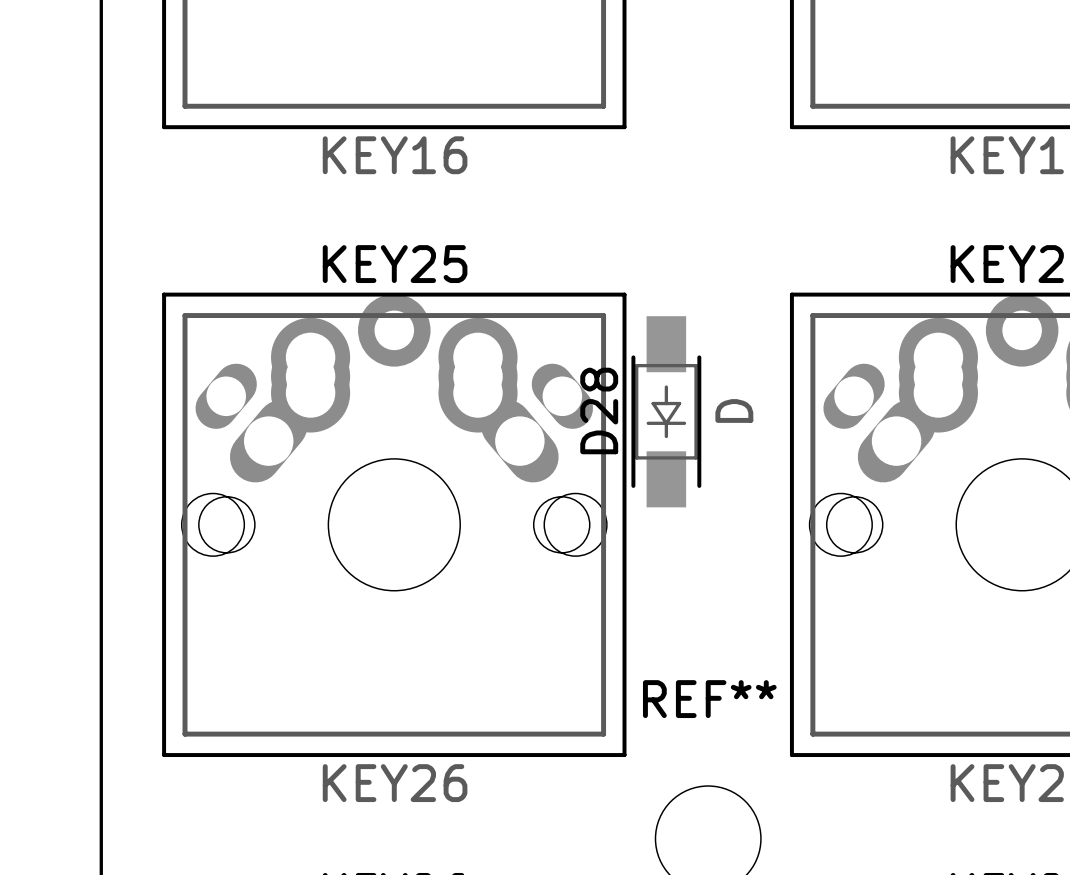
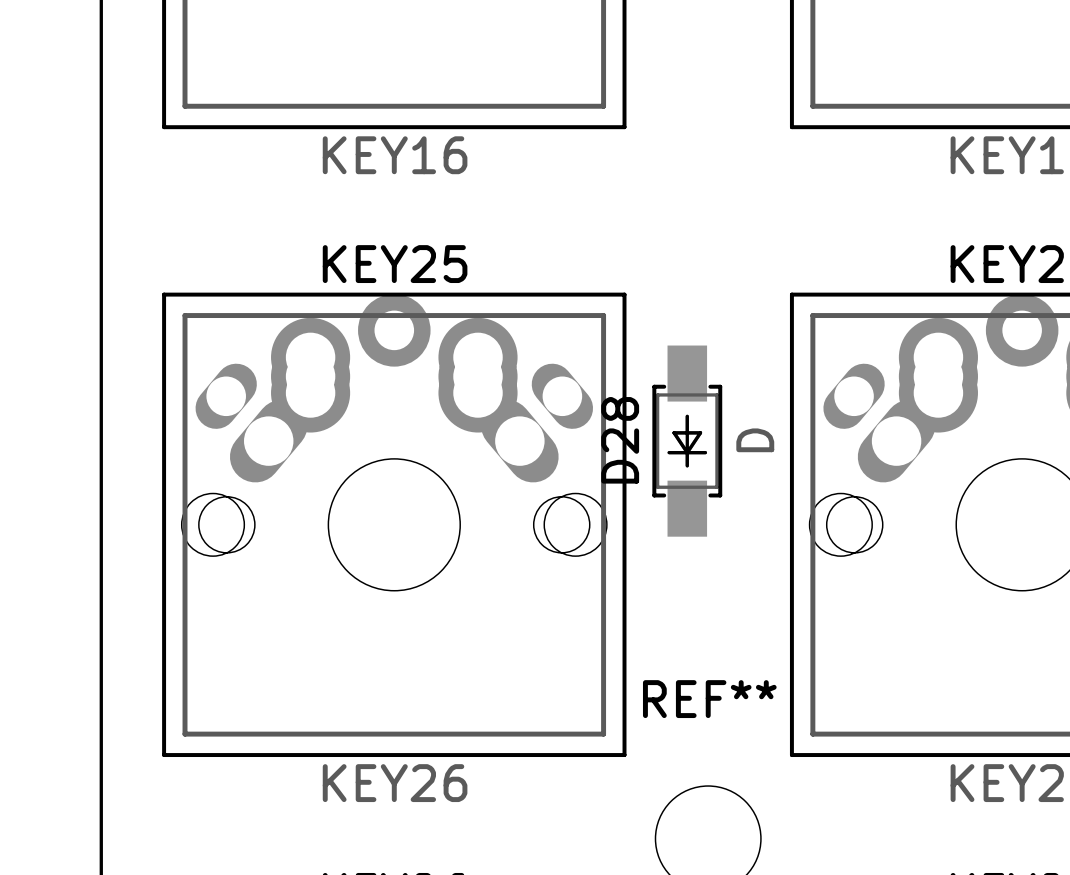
D28 footprint: [631, 316, 702, 508] -> [652, 345, 723, 537]

